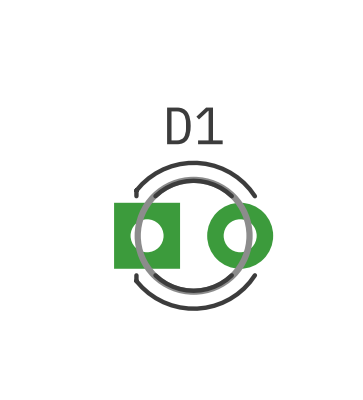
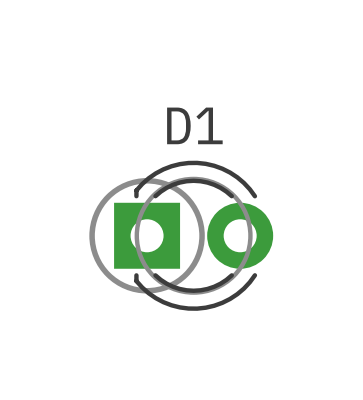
D1 footprint: [114, 160, 274, 311] -> [89, 160, 274, 311]

